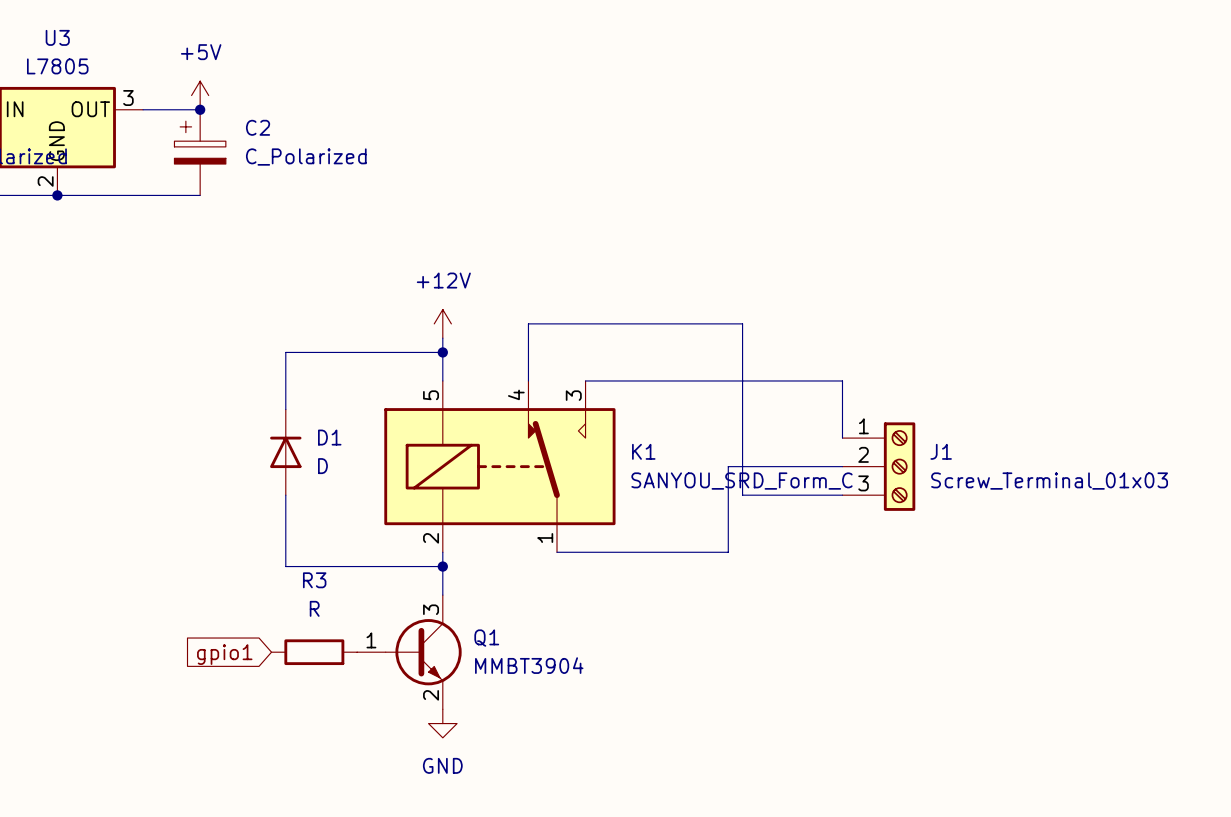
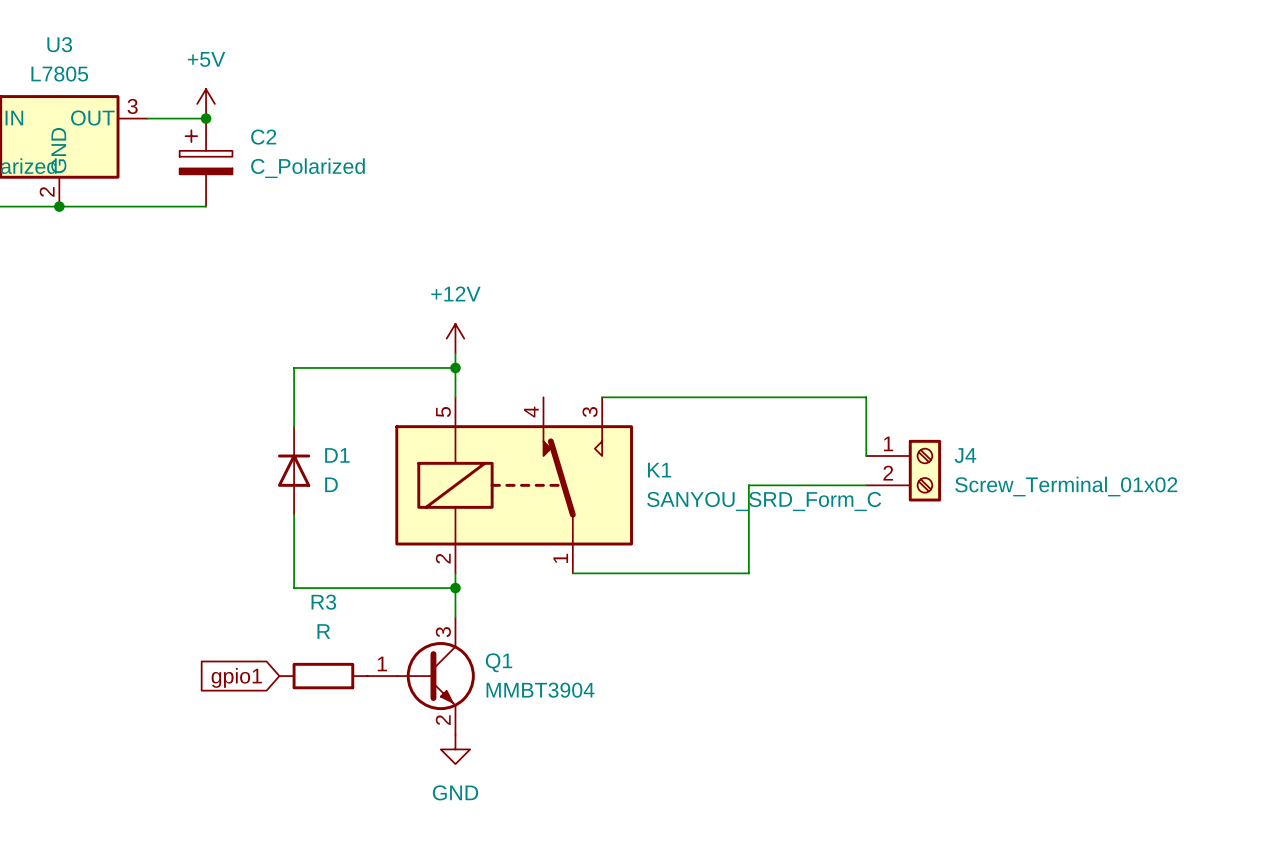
wire: (528, 380) (528, 323) (742, 323) (742, 495) (842, 495) -> none
J4: none -> Screw_Terminal_01x02 (903, 470)
J1: Screw_Terminal_01x03 (878, 466) -> none

